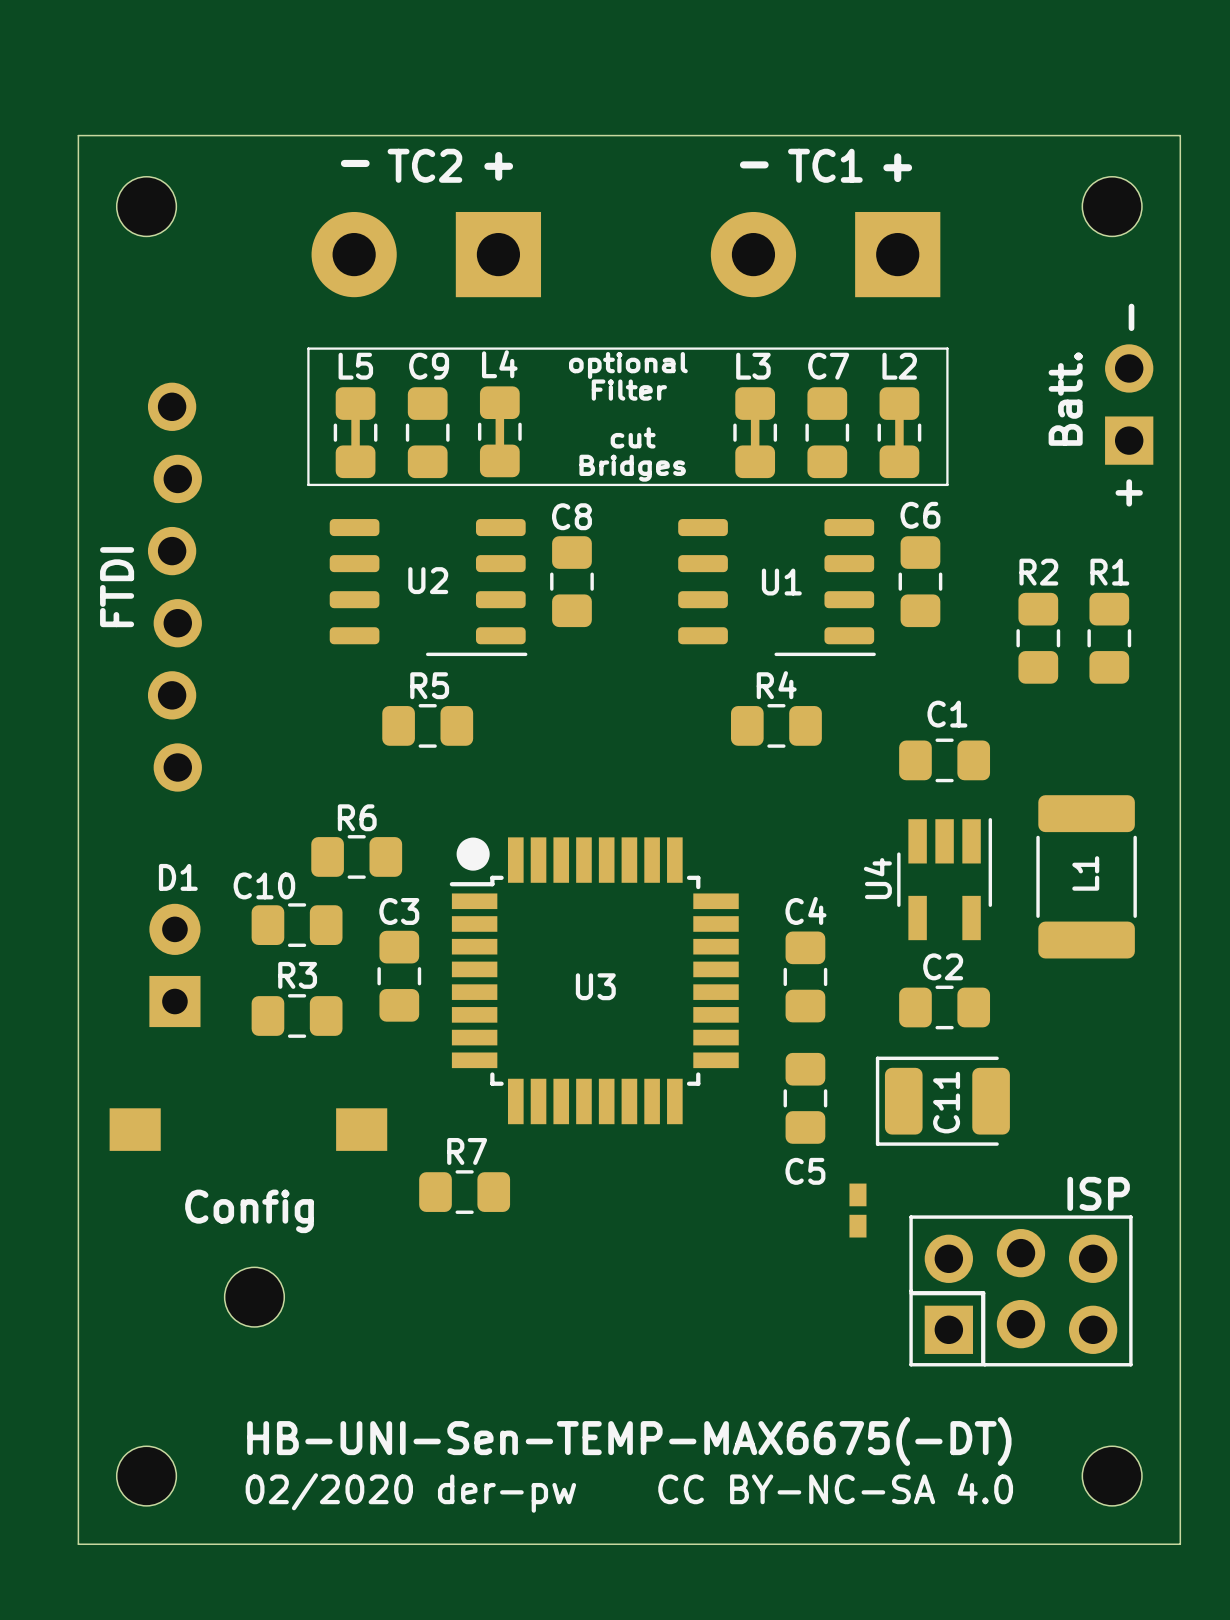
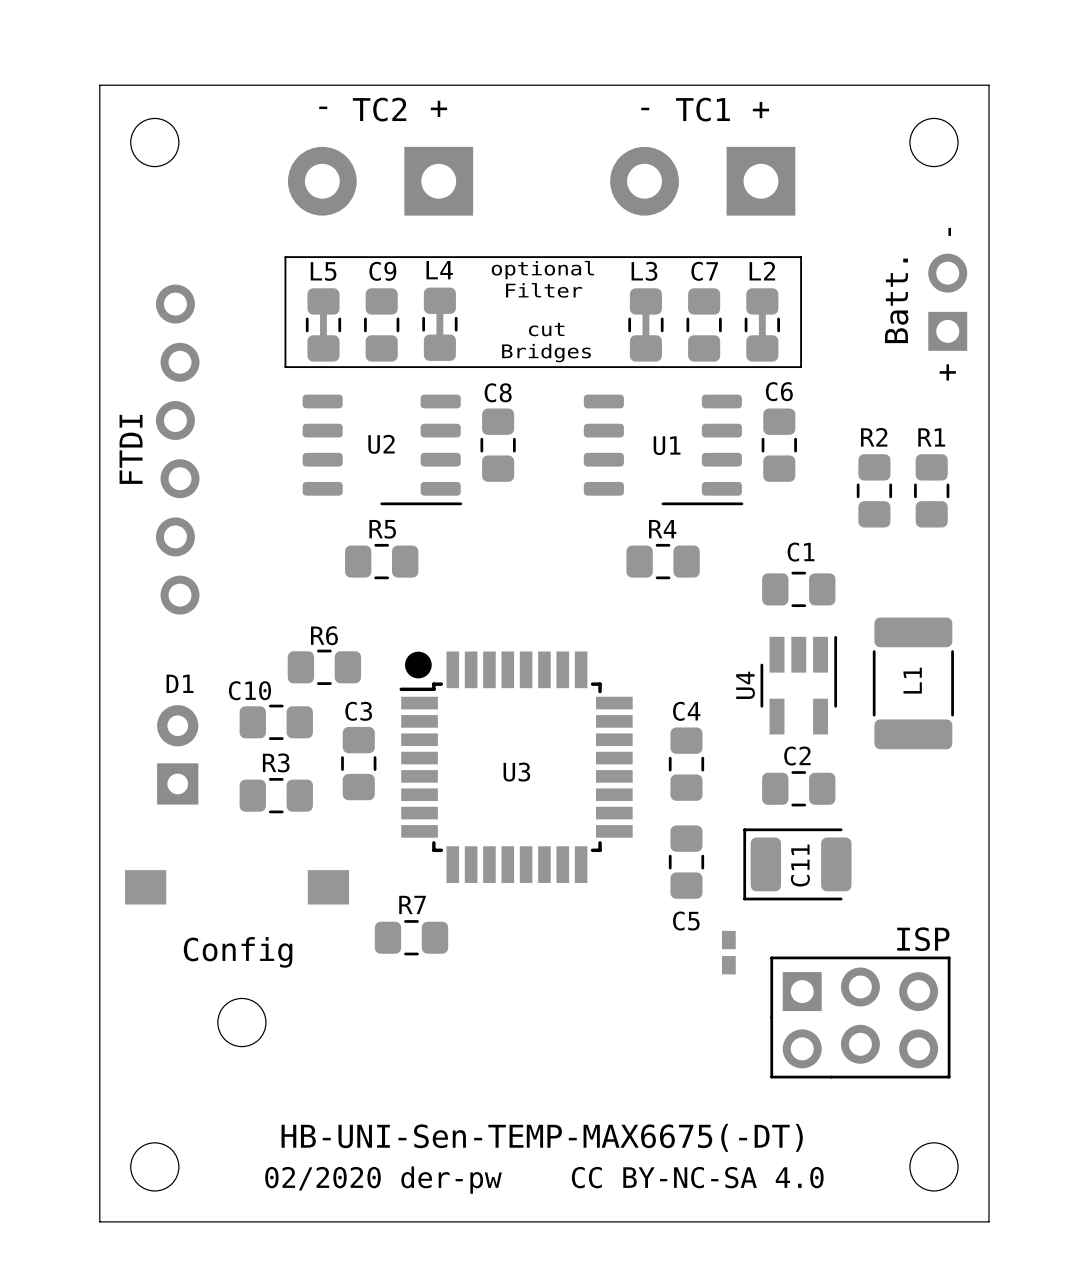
part footprint: [909, 1215, 1133, 1367] -> [770, 956, 951, 1079]

